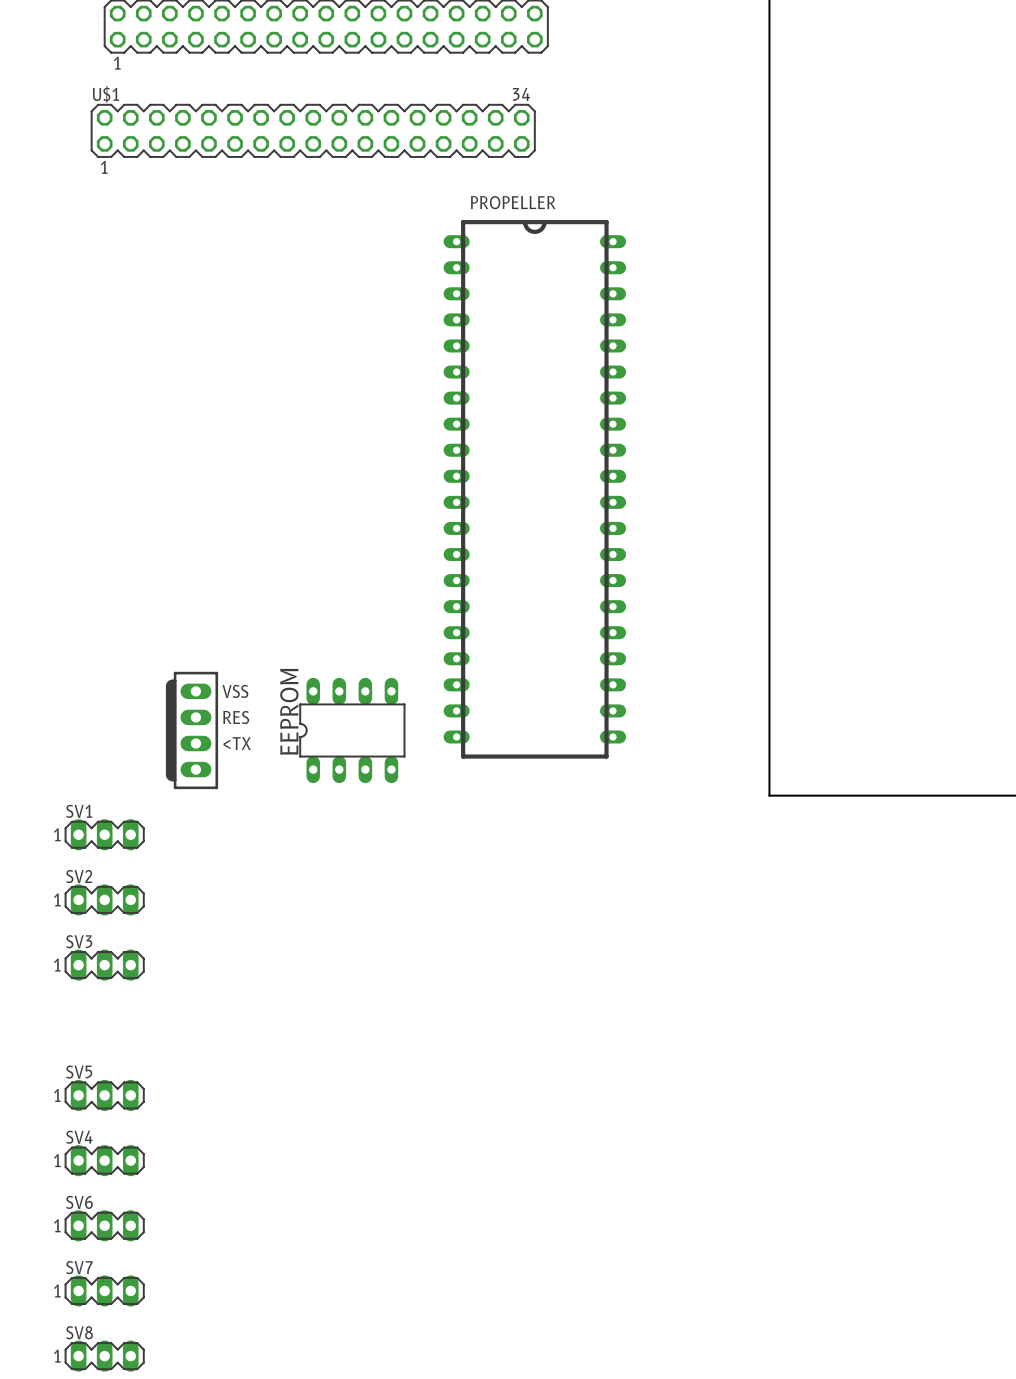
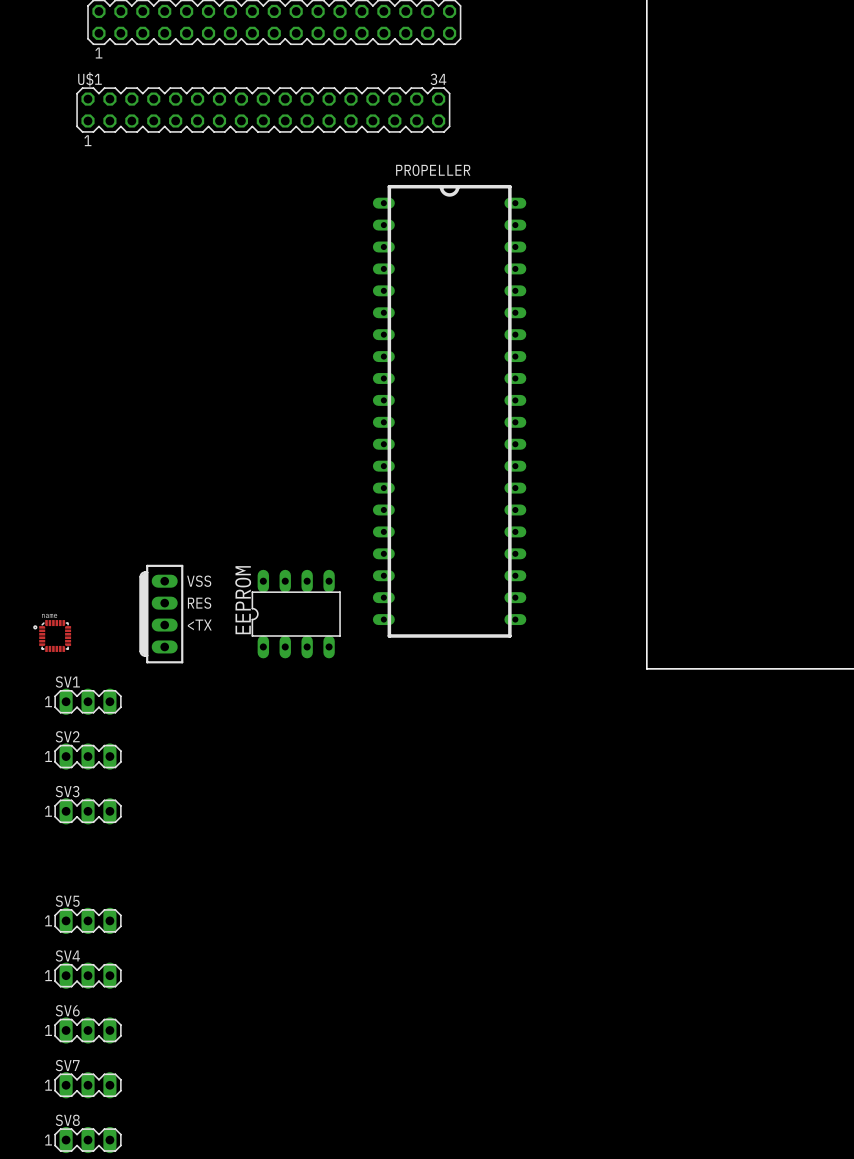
part: none -> (52, 636)

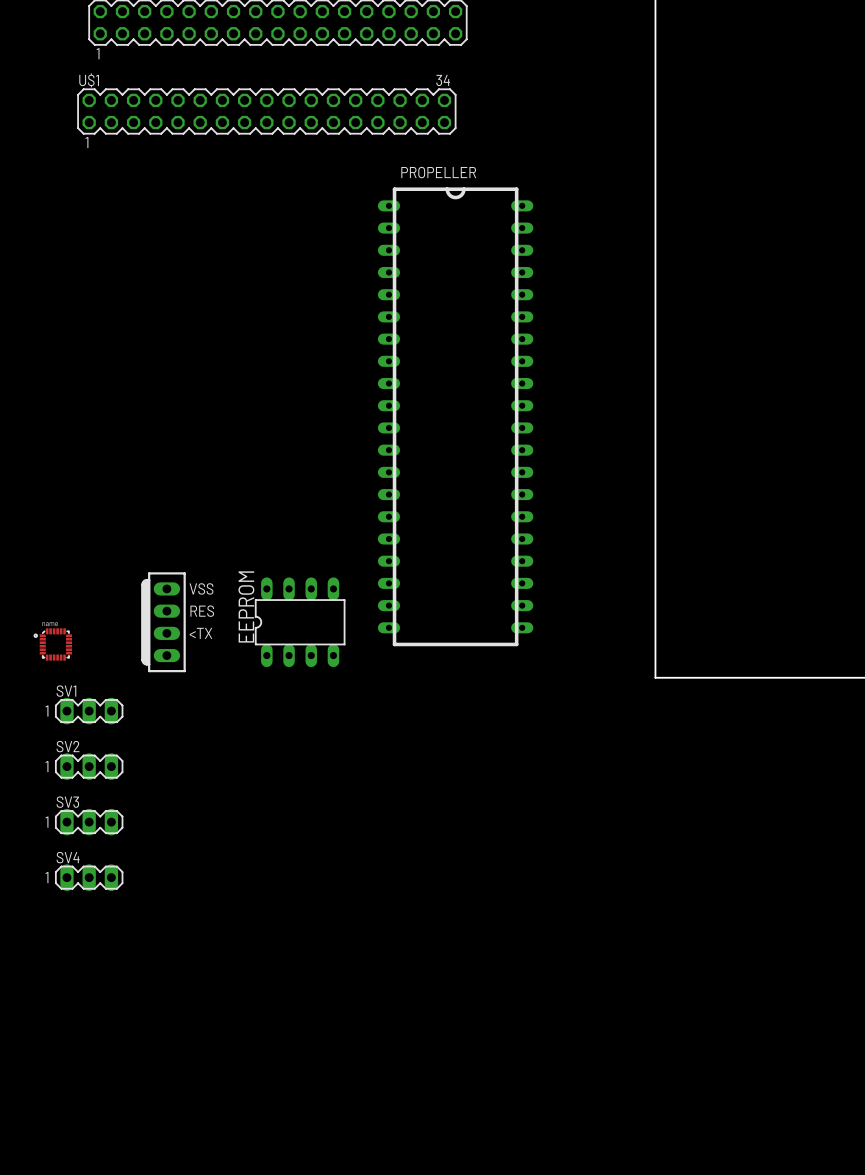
SV5: (88, 920) -> none
SV4 position: (88, 975) -> (89, 877)
SV6: (88, 1030) -> none
SV7: (88, 1085) -> none
SV8: (88, 1140) -> none

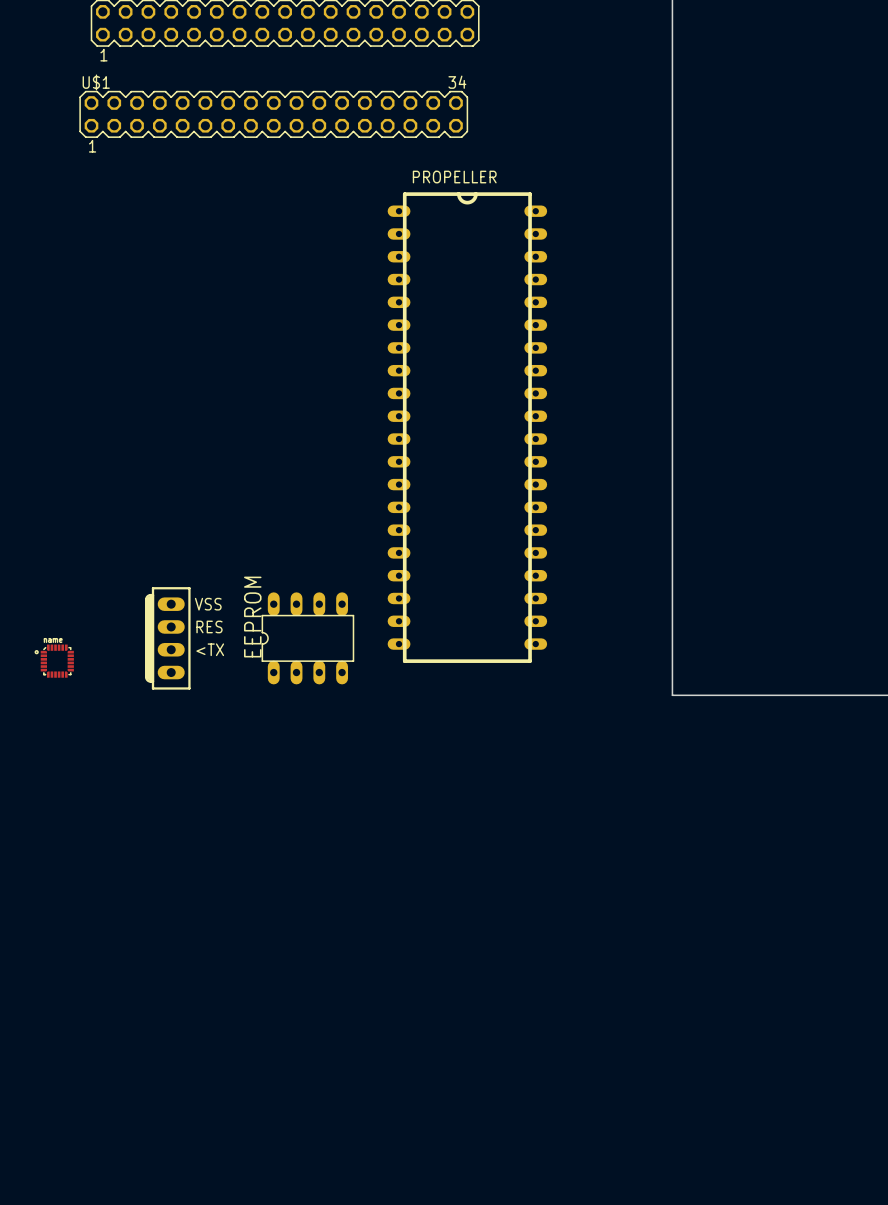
SV1: (89, 711) -> none
SV2: (89, 766) -> none
SV3: (89, 822) -> none
SV4: (89, 877) -> none

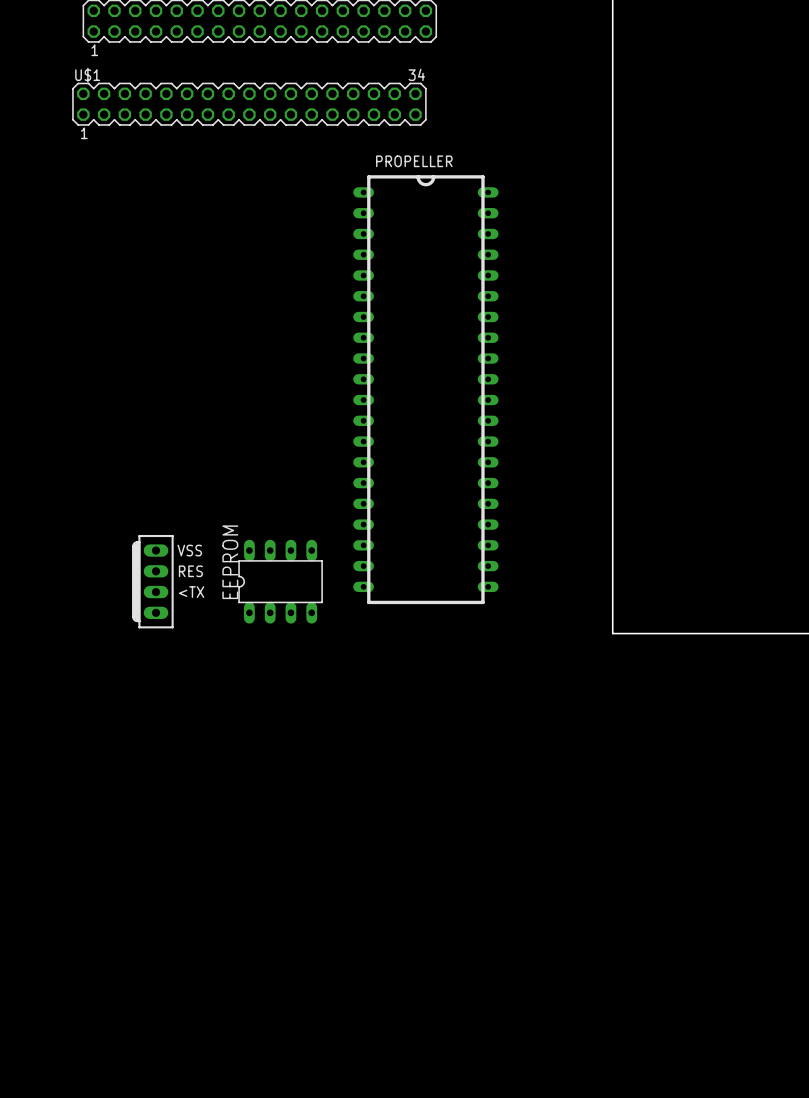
part: (54, 661) -> none

